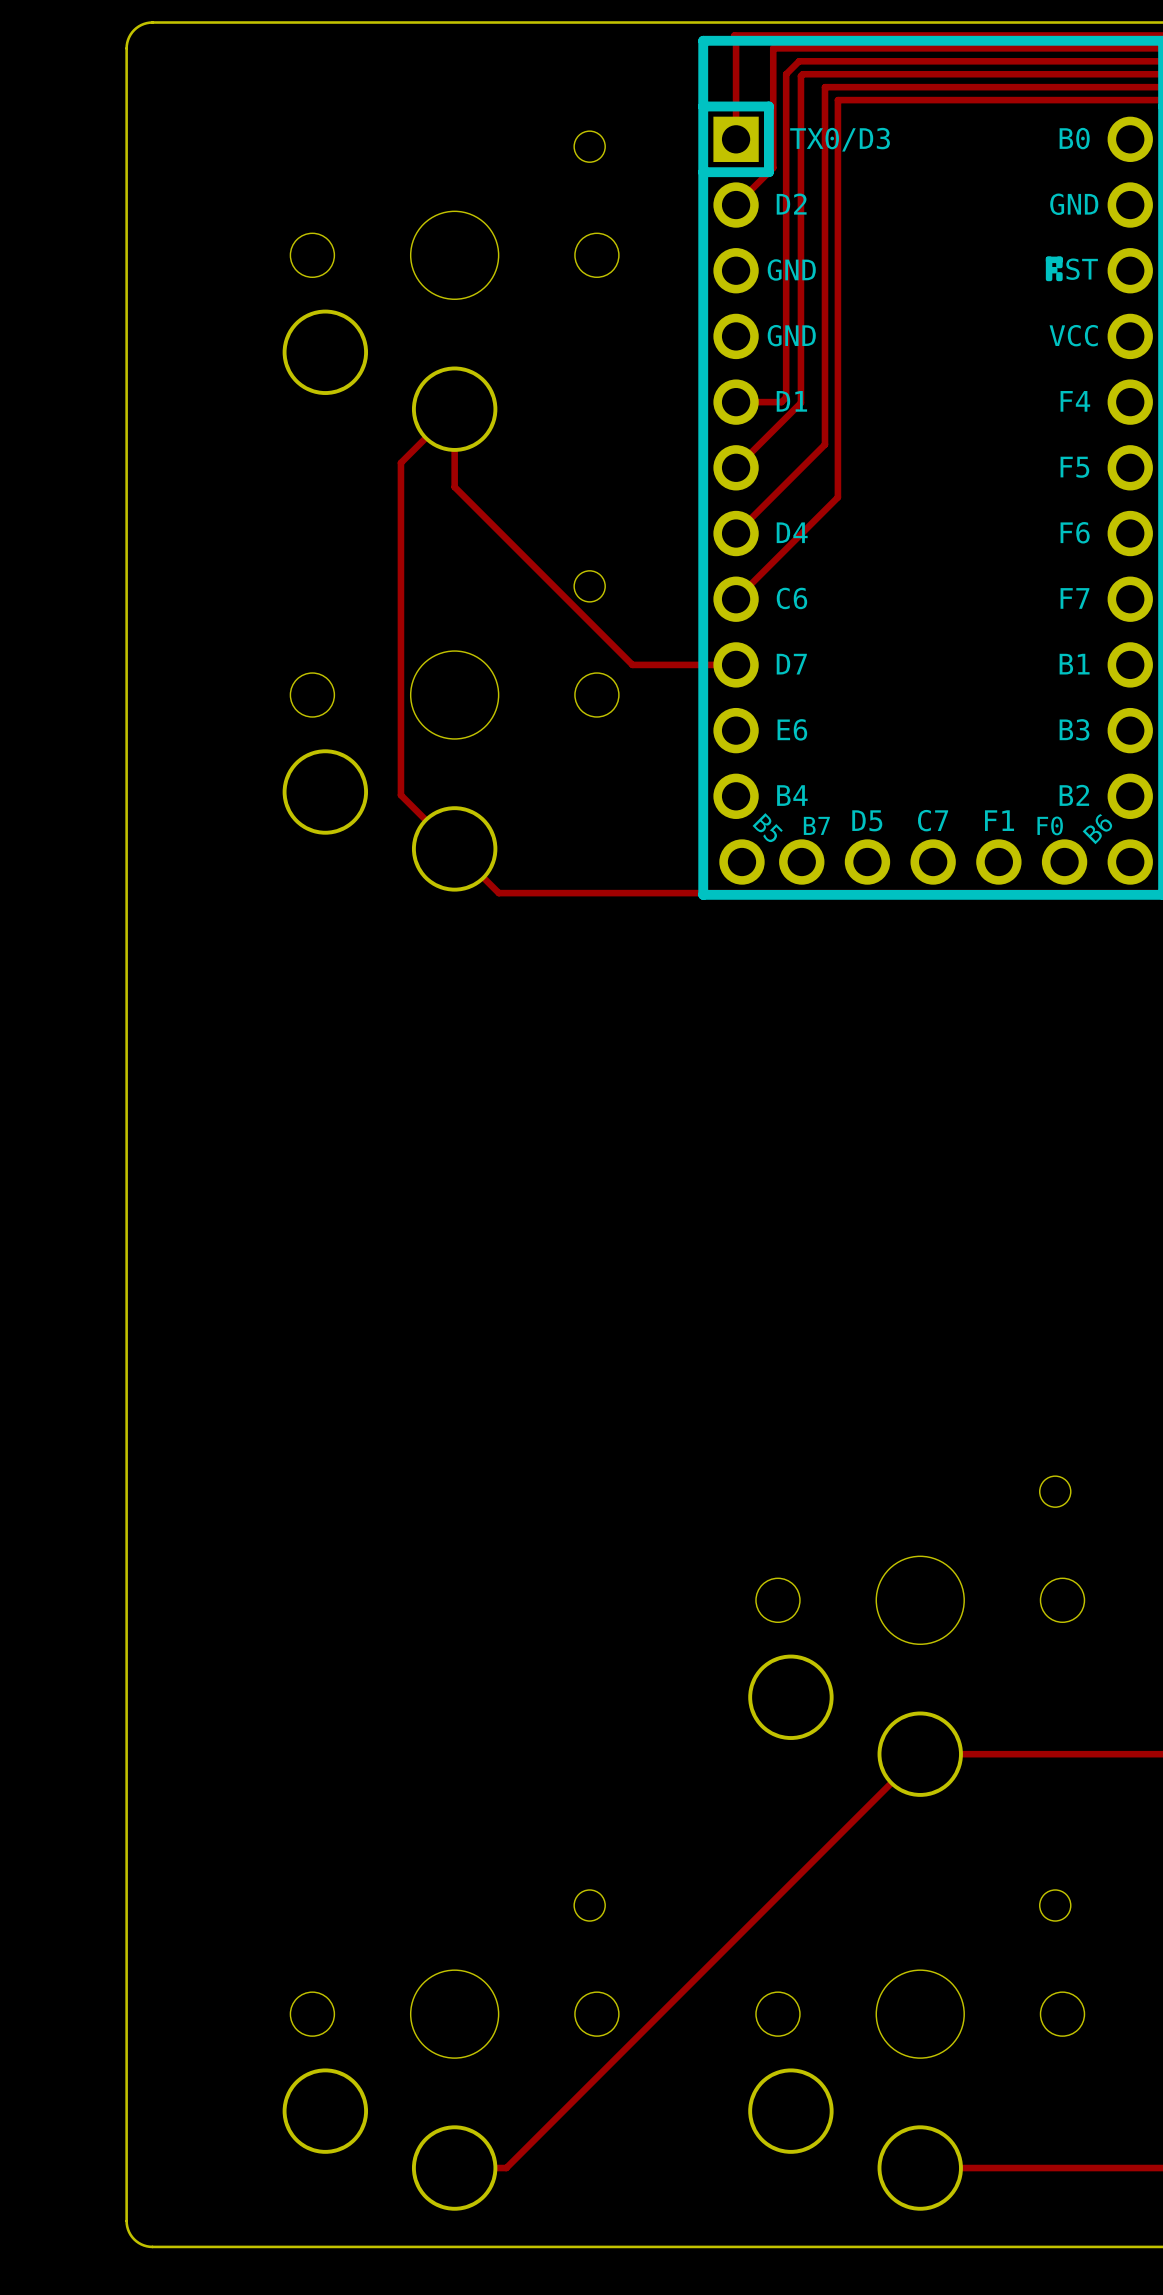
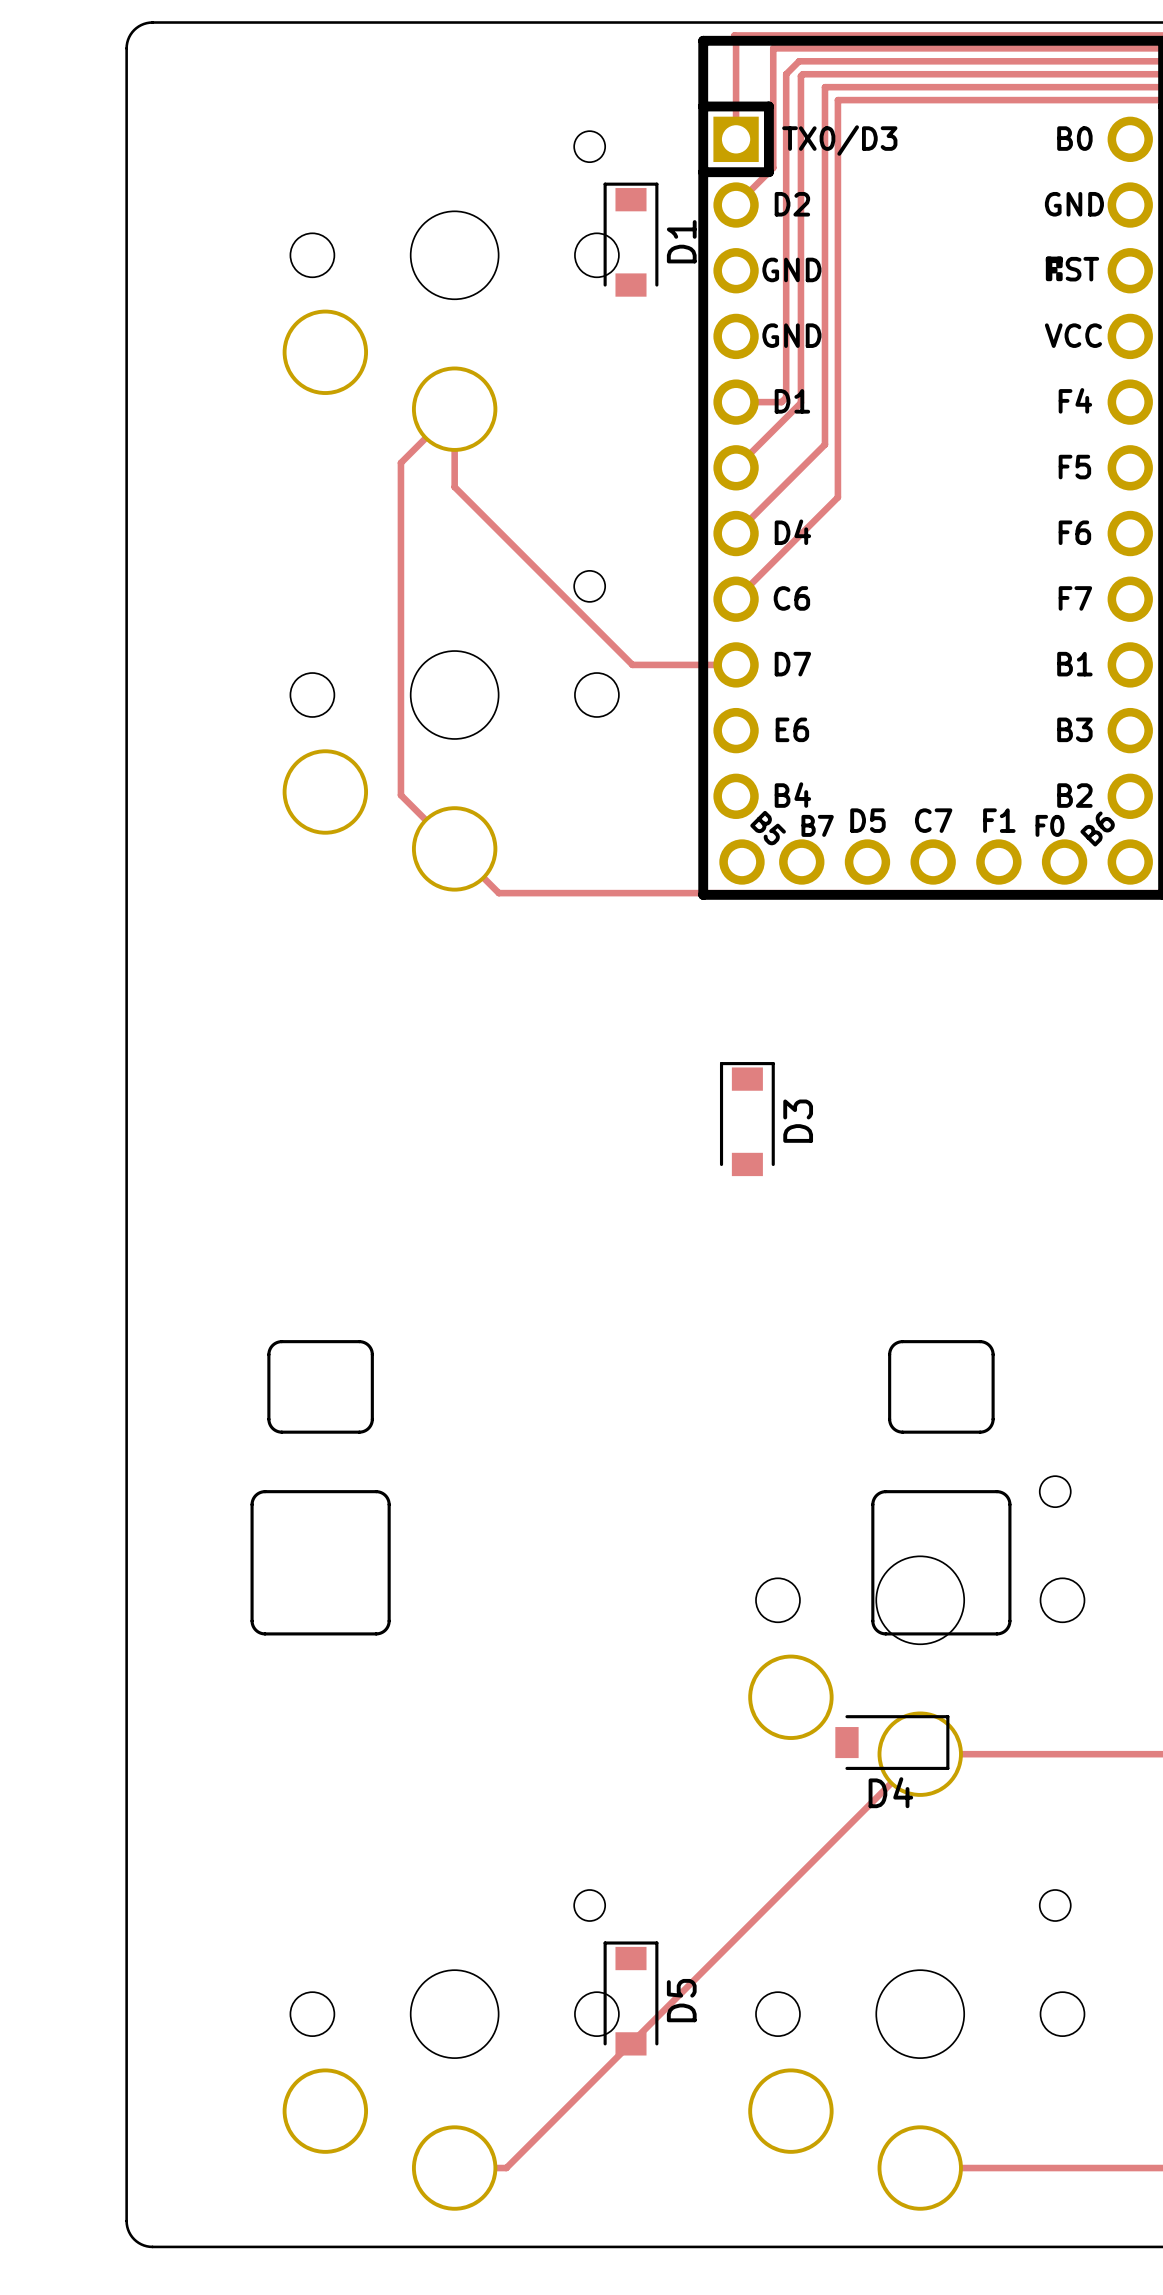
D1: none -> (630, 239)
D3: none -> (747, 1119)
drawing: none -> [250, 1340, 1012, 1636]
D4: none -> (892, 1742)
D5: none -> (630, 1998)

